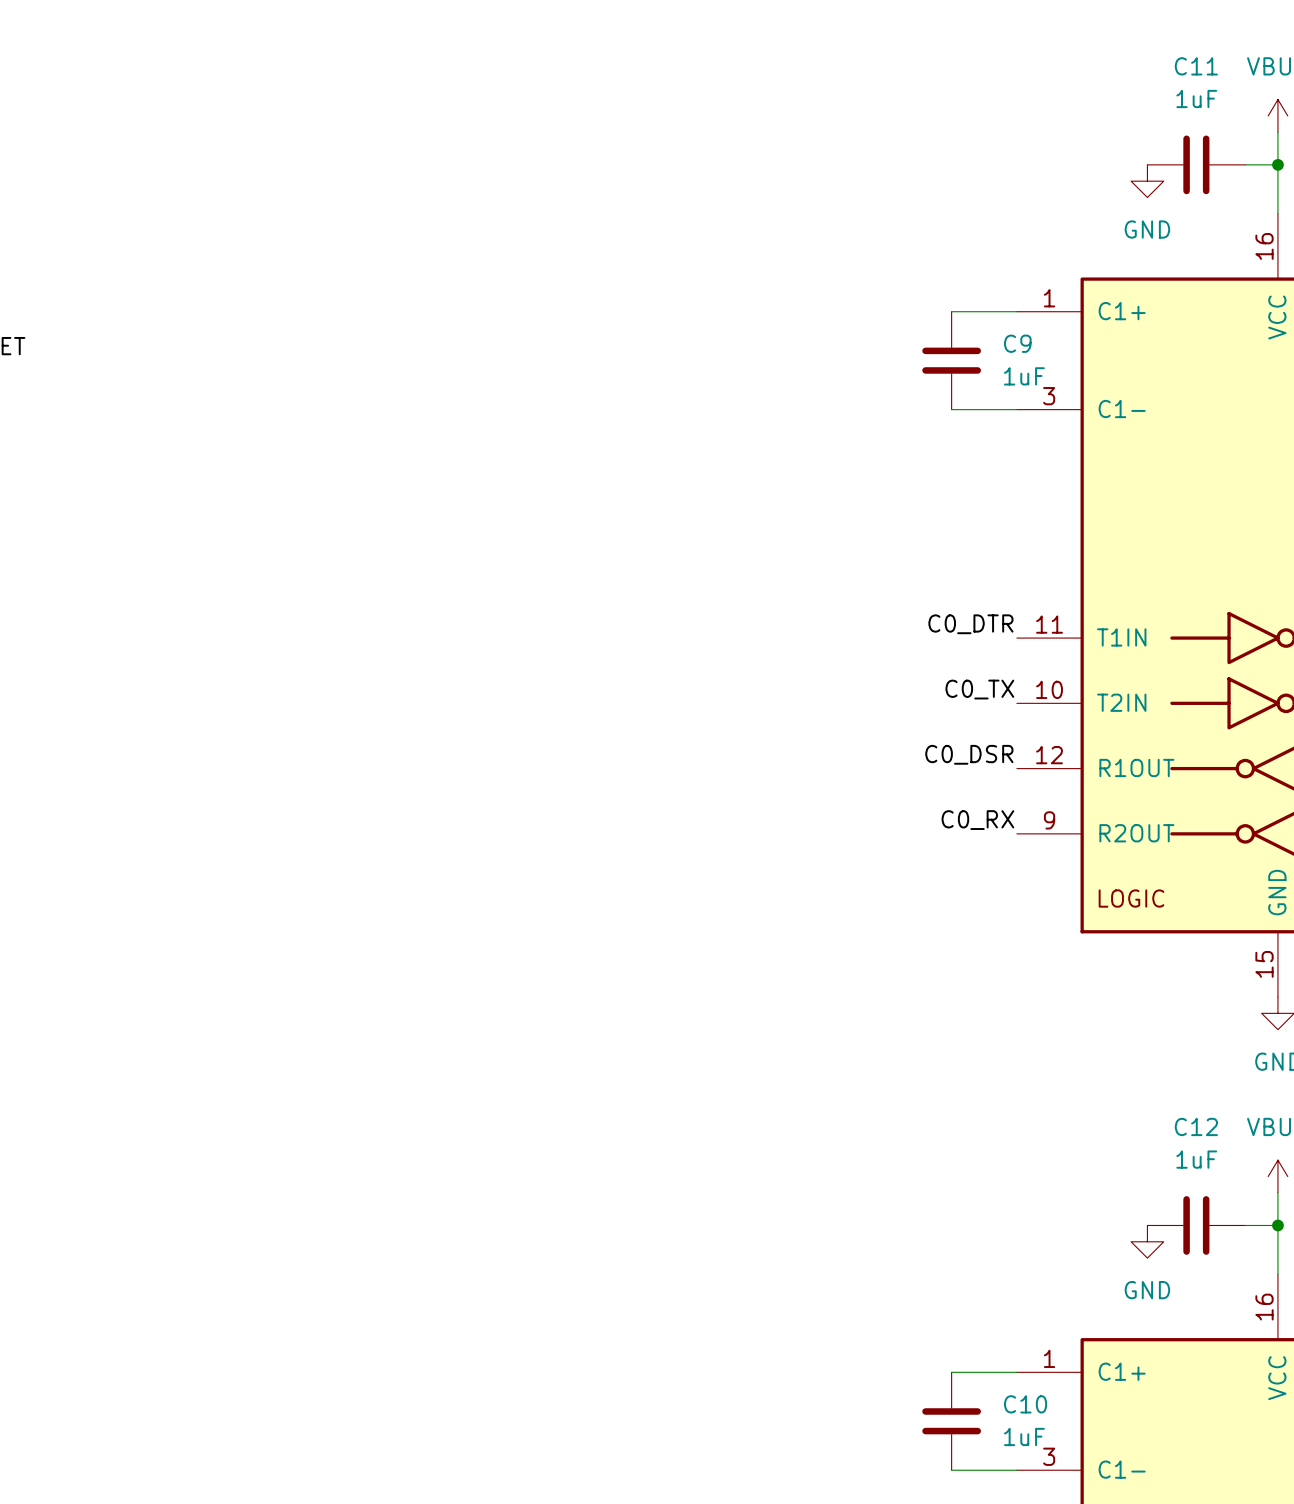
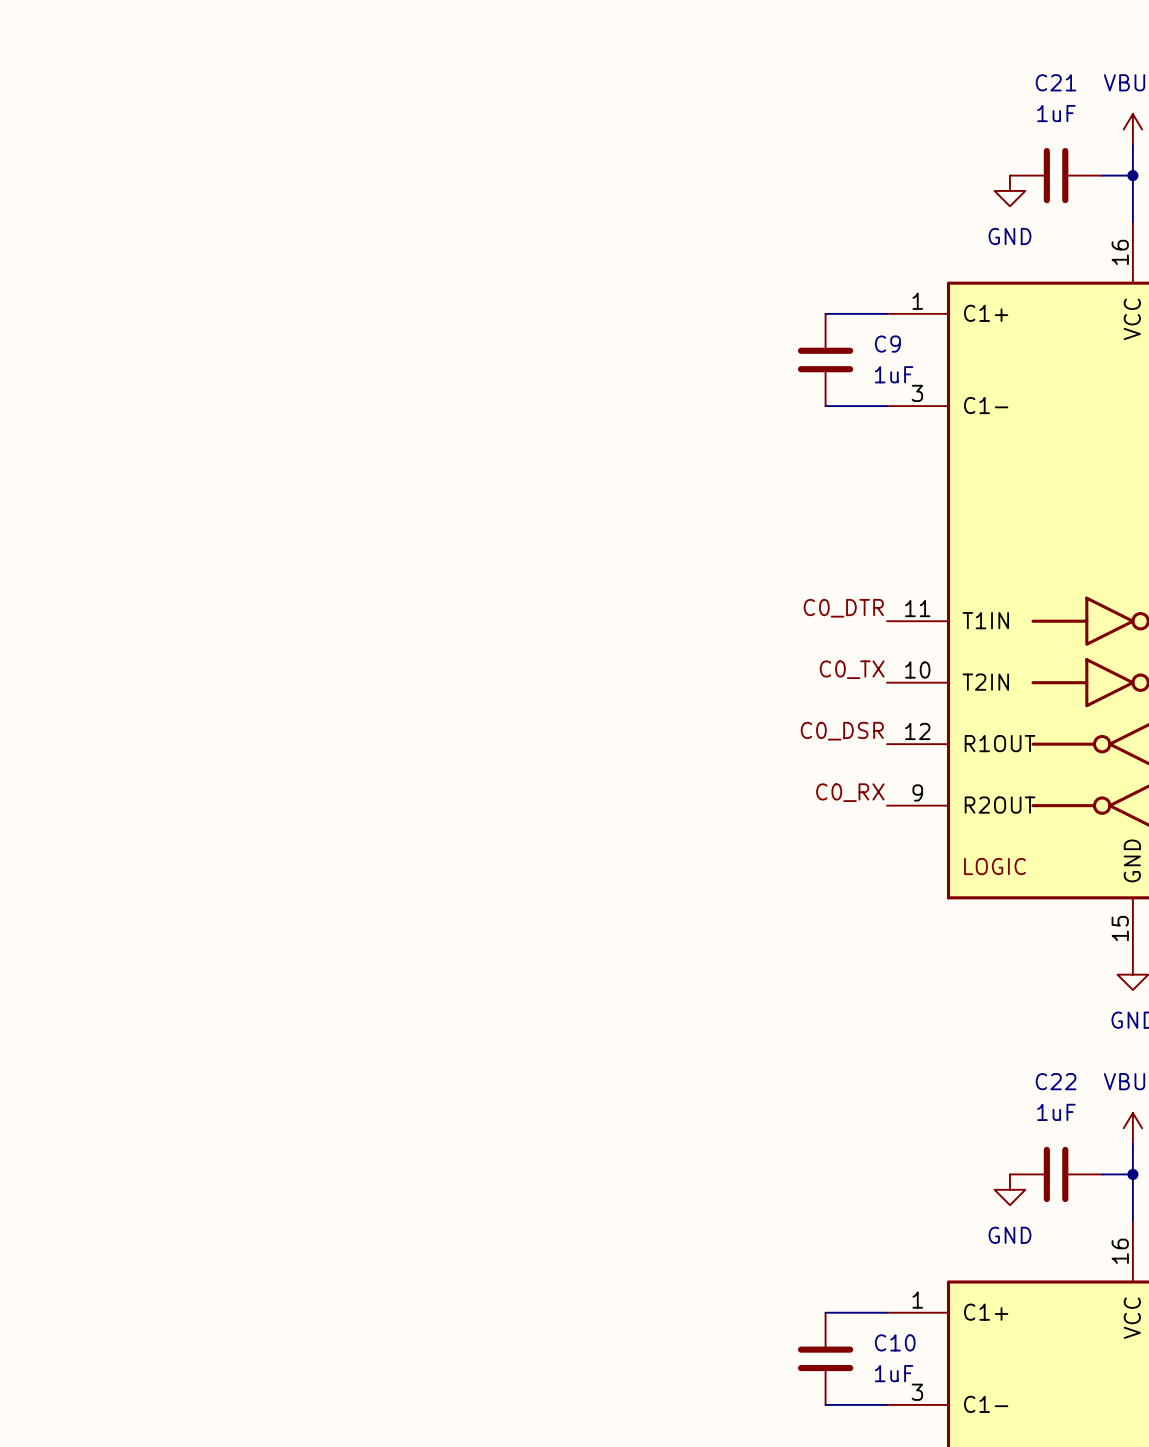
C11 name: C11 (1196, 66) -> C21 (1056, 82)
C12 name: C12 (1196, 1126) -> C22 (1056, 1081)

